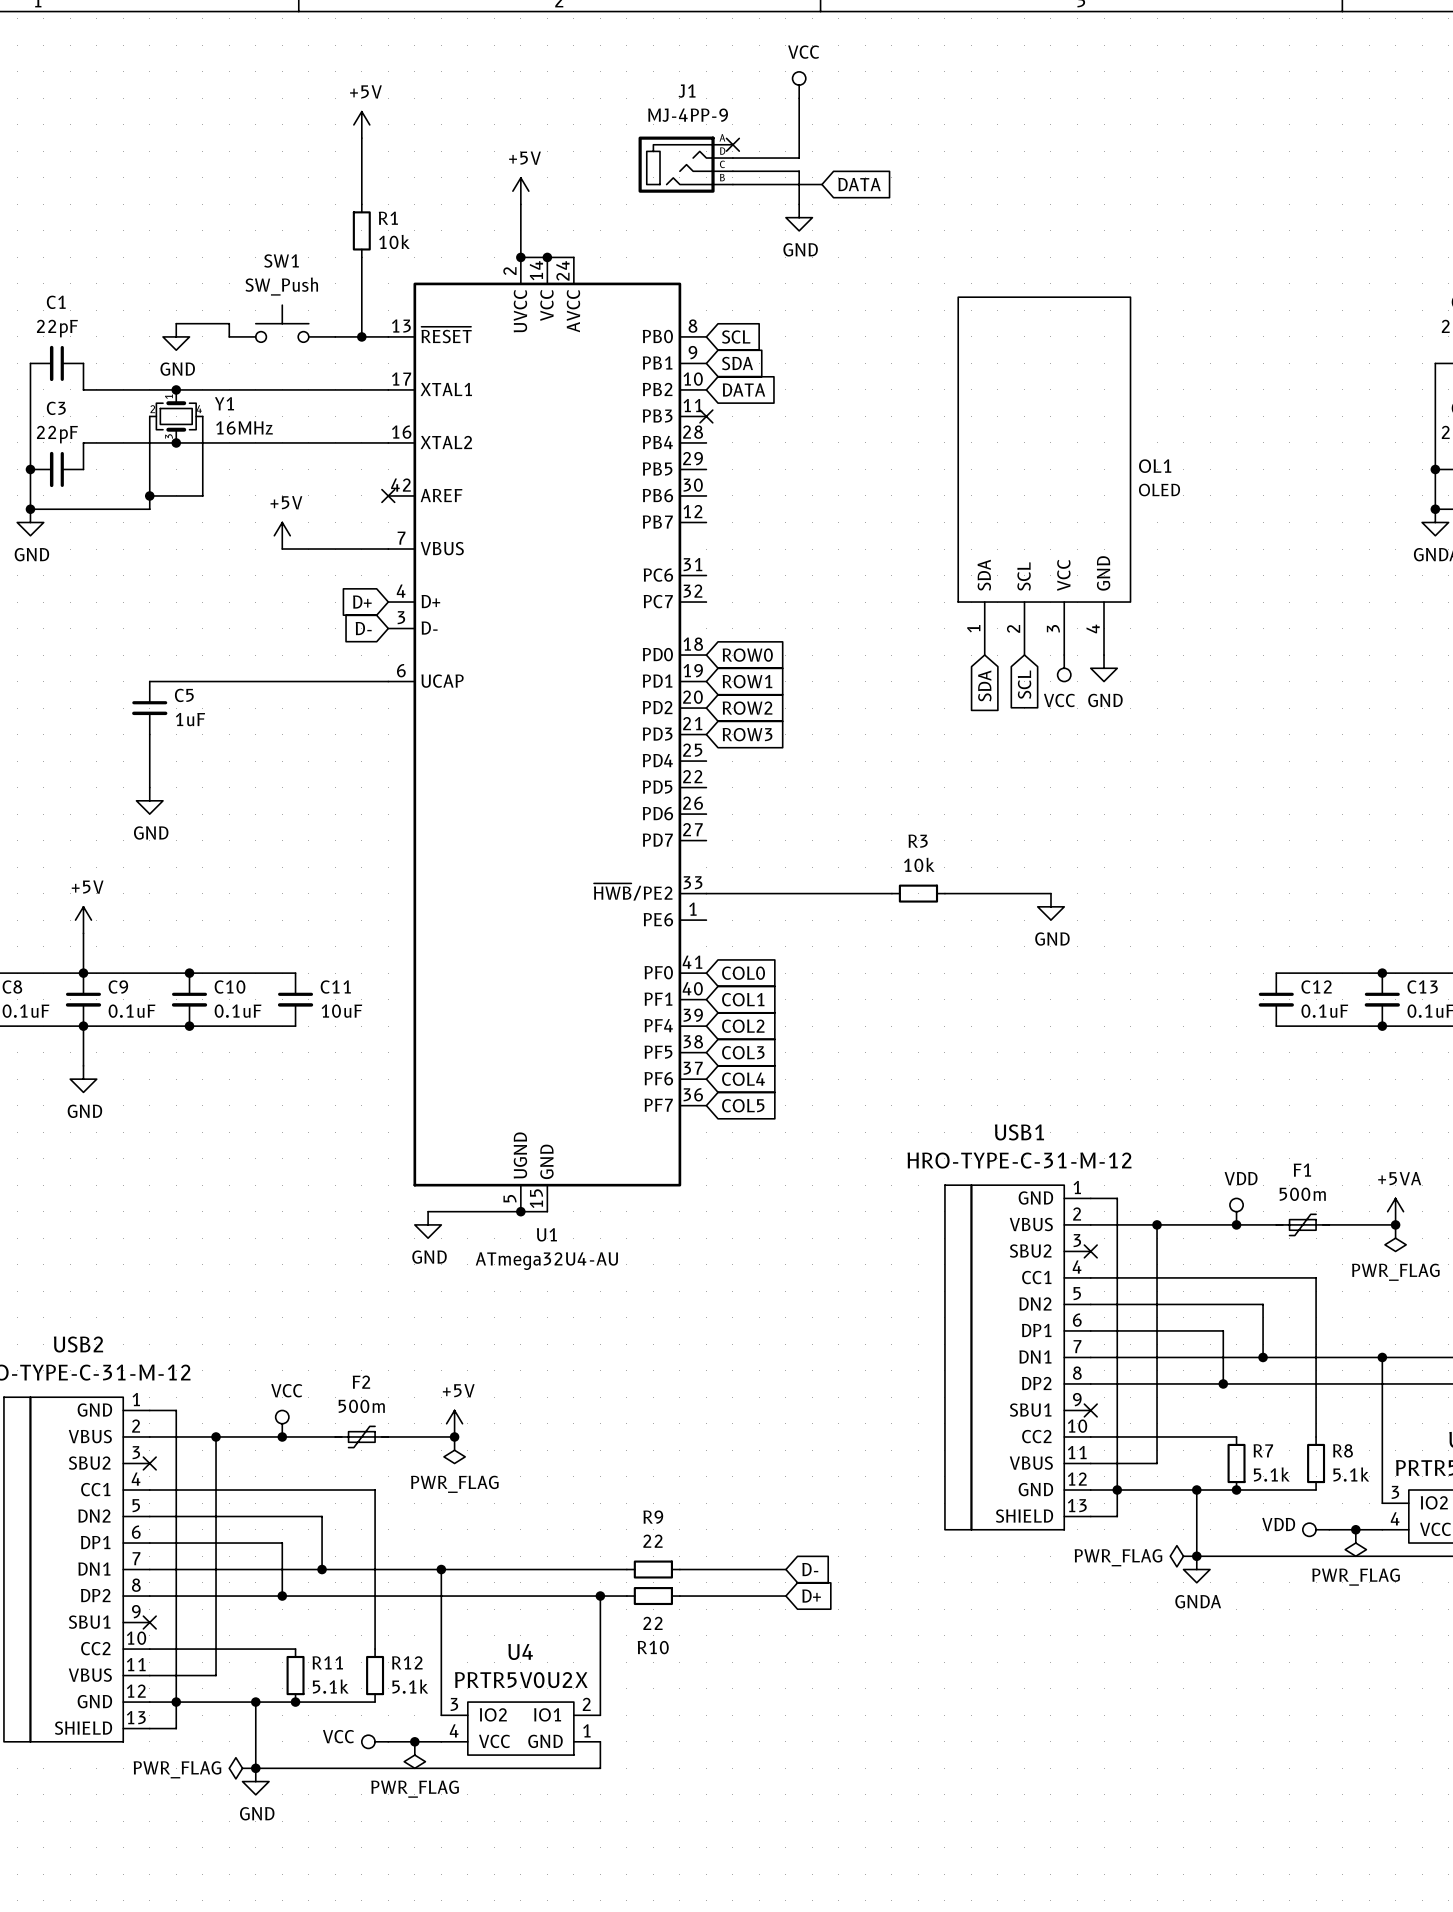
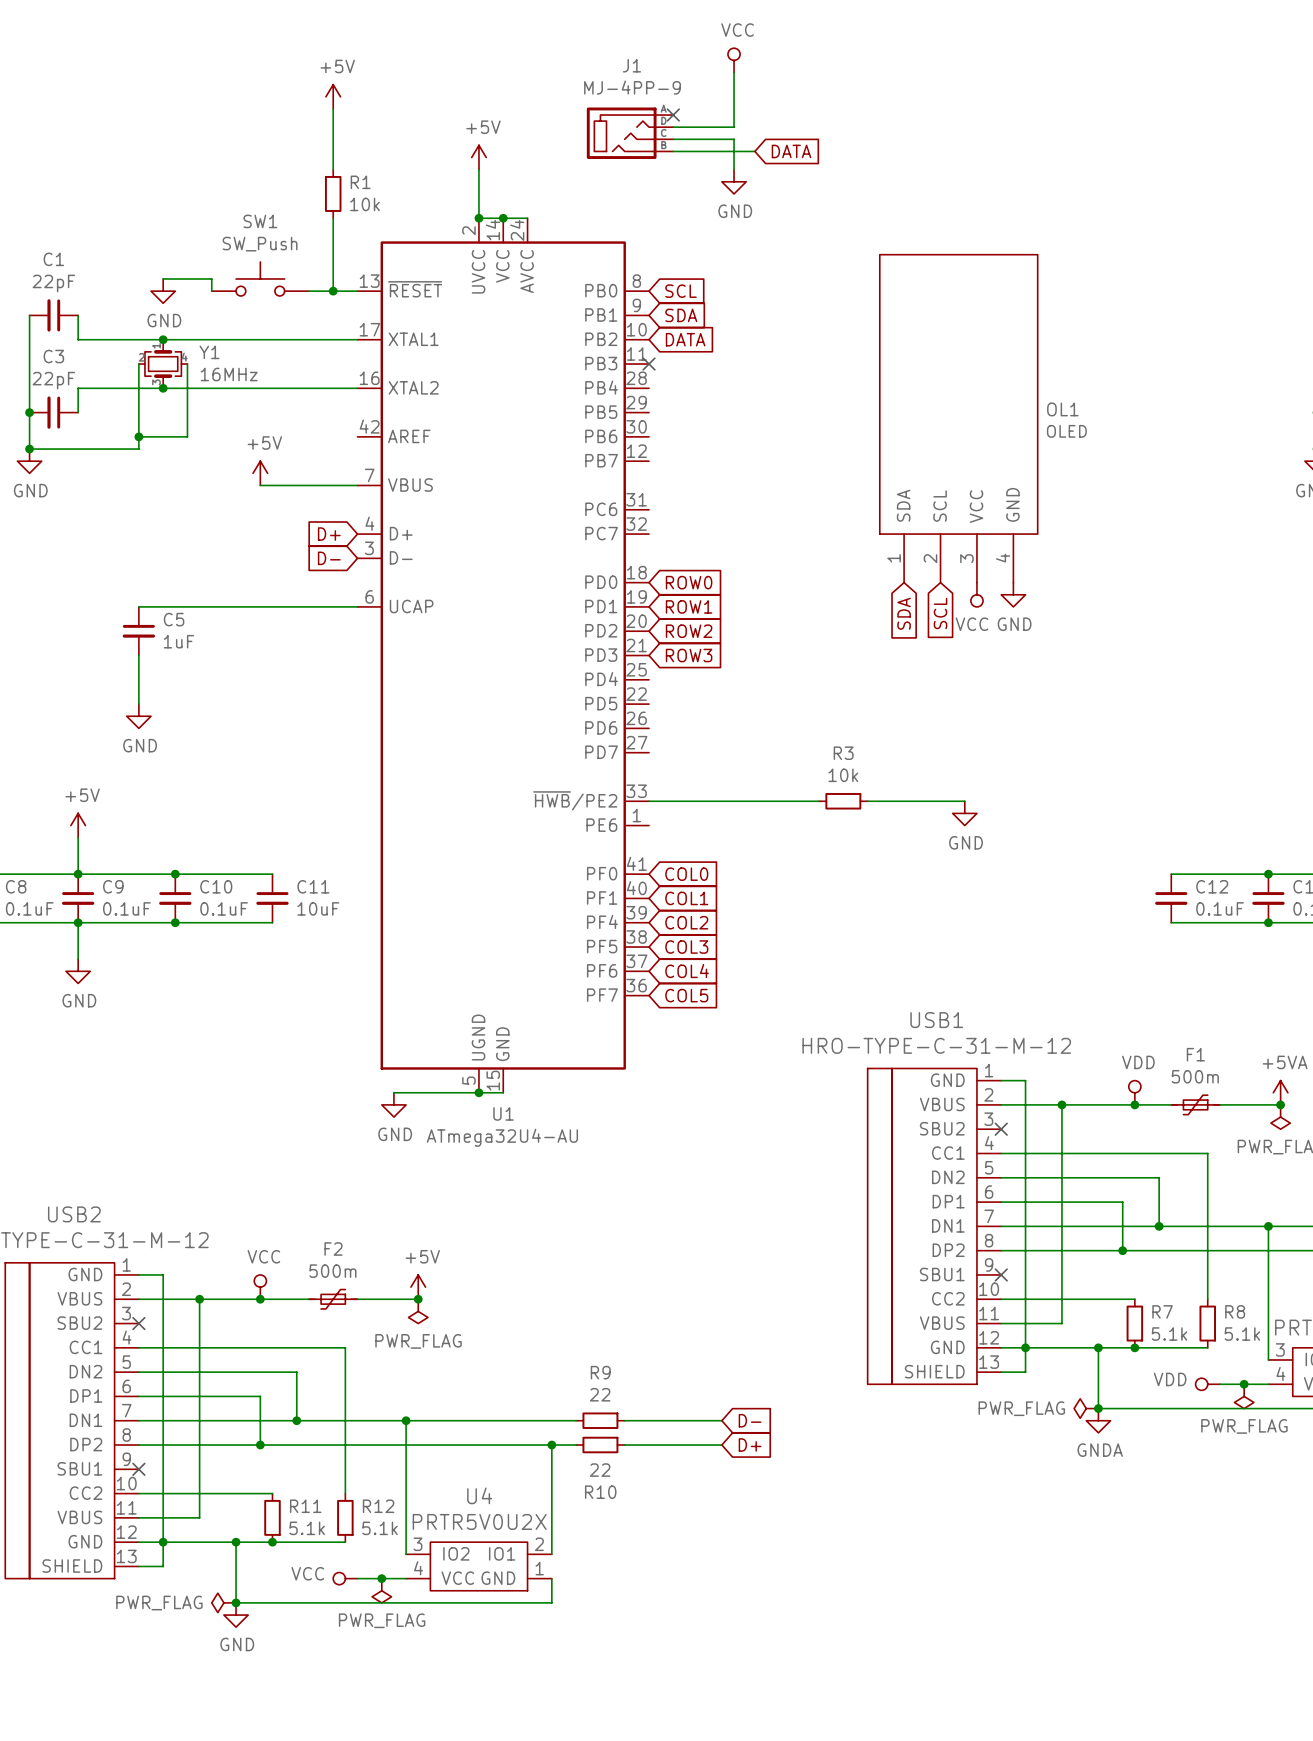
no-connect mark: (388, 495) -> none

